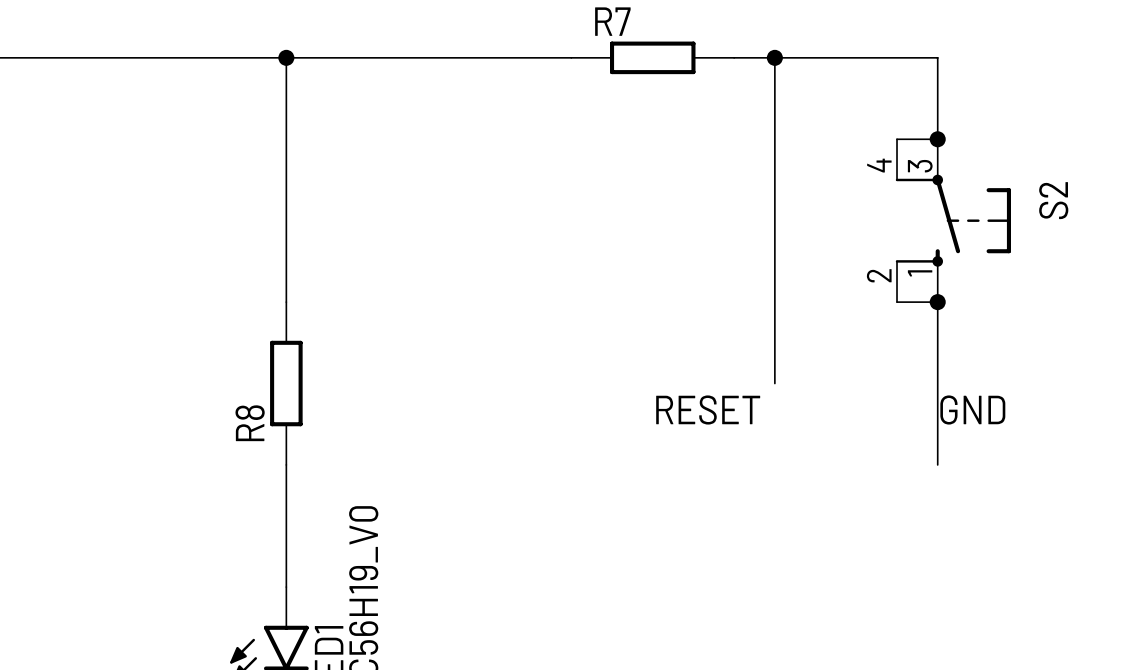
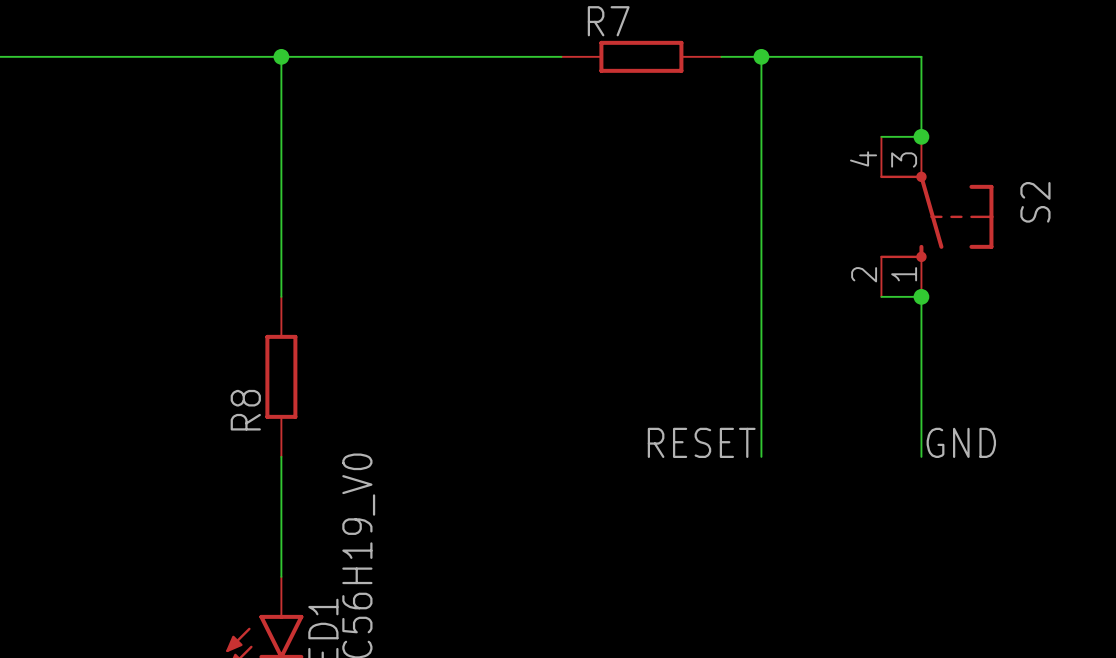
wire: none -> (761, 376) (761, 456)
label position: RESET (708, 409) -> RESET (701, 442)
label position: GND (972, 409) -> GND (961, 442)

